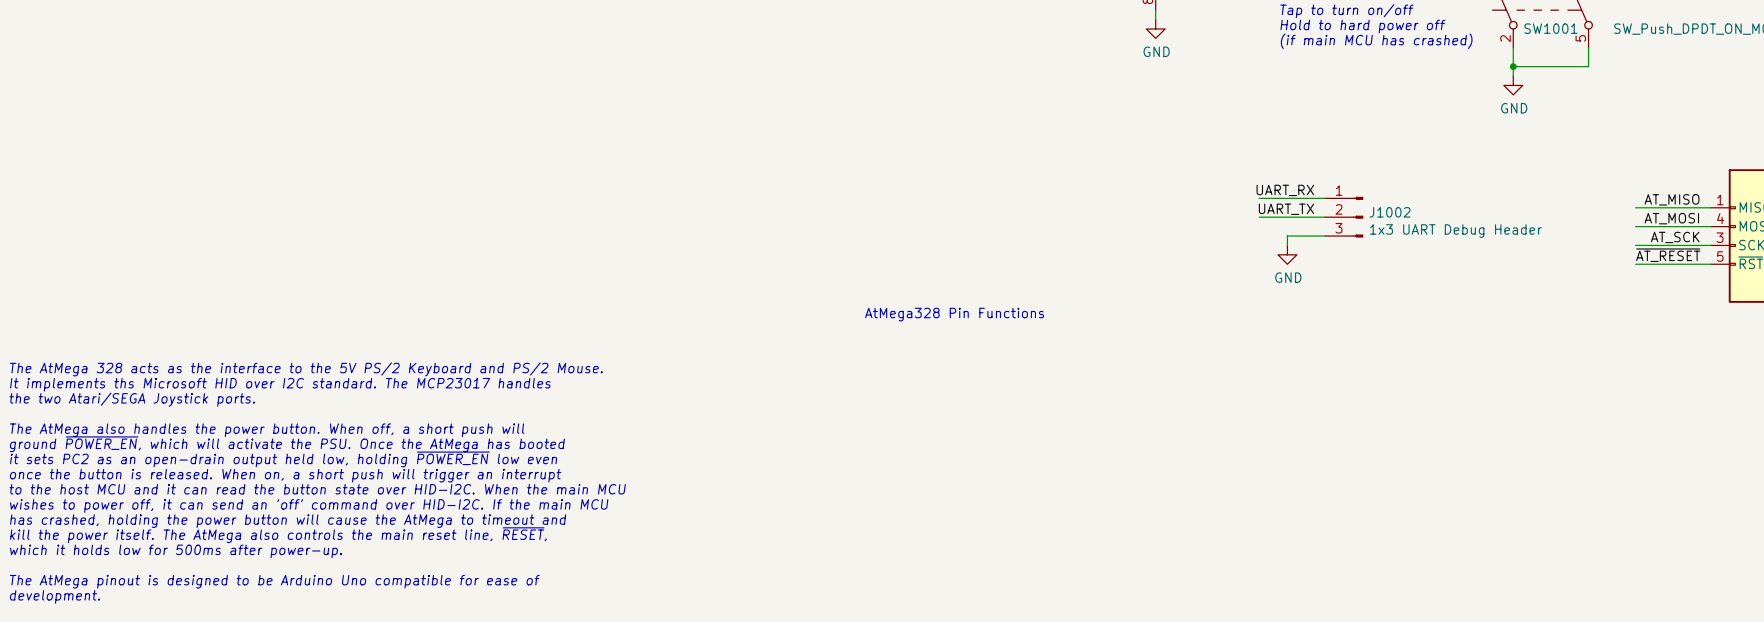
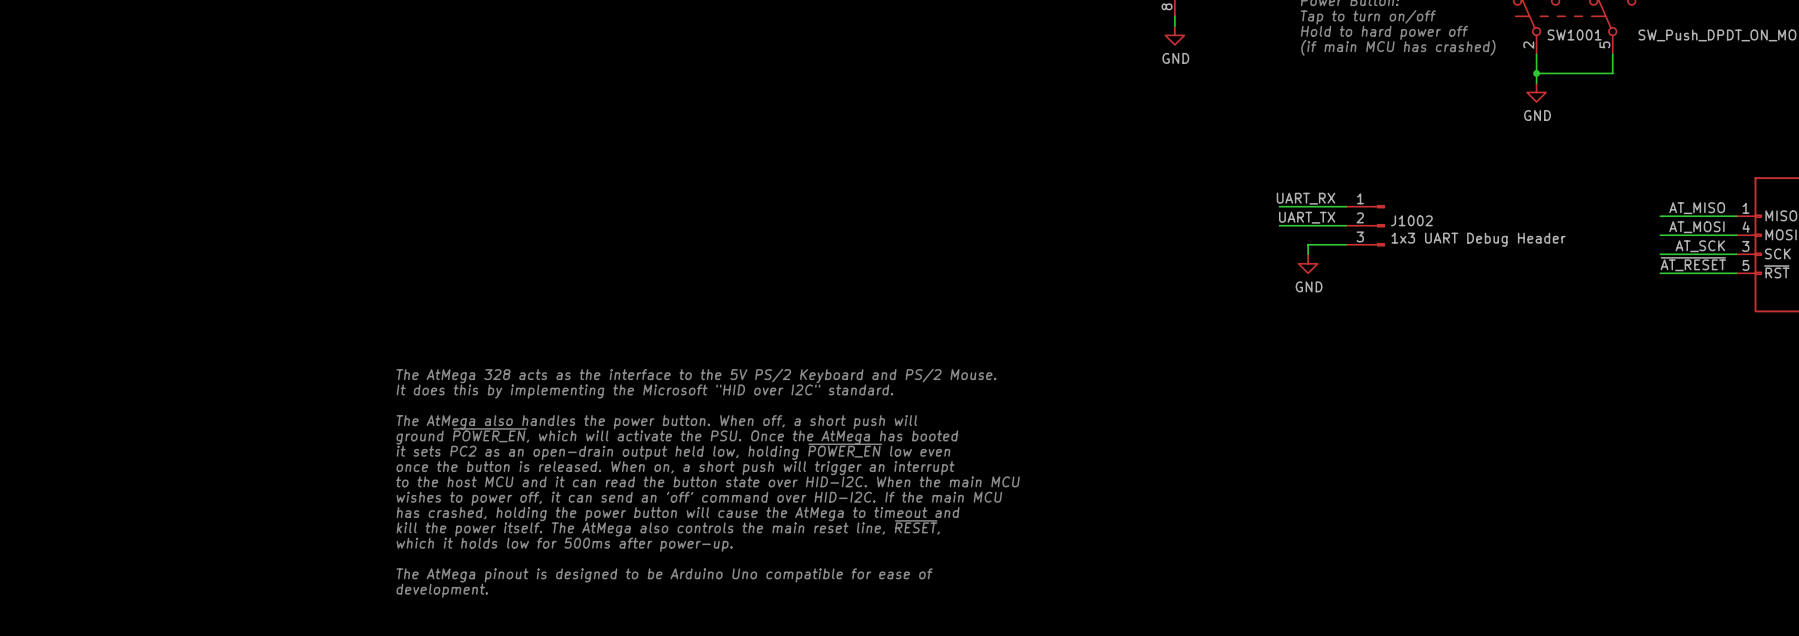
text: AtMega328 Pin Functions (954, 314) -> none
text: none -> The AtMega 328 acts as the interface to the 5V PS/2 Keyboard and PS/2 Mouse. (696, 375)
text: The AtMega 328 acts as the interface to the 5V PS/2 Keyboard and PS/2 Mouse. (306, 369) -> none
text: none -> It does this by implementing the Microsoft "HID over I2C" standard. (644, 391)
text: It implements ths Microsoft HID over I2C standard. The MCP23017 handles (280, 384) -> none
text: the two Atari/SEGA Joystick ports. (132, 399) -> none
text: none -> The AtMega also handles the power button. When off, a short push will (656, 422)
text: none -> ground ~{POWER_EN}, which will activate the PSU. Once the AtMega has booted (677, 436)
text: The AtMega also handles the power button. When off, a short push will (267, 430) -> none
text: none -> it sets PC2 as an open-drain output held low, holding ~{POWER_EN} low even (673, 451)
text: ground ~{POWER_EN}, which will activate the PSU. Once the AtMega has booted (287, 444) -> none
text: none -> once the button is released. When on, a short push will trigger an interrupt (675, 468)
text: it sets PC2 as an open-drain output held low, holding ~{POWER_EN} low even (283, 459) -> none
text: none -> to the host MCU and it can read the button state over HID-I2C. When the main MCU (707, 481)
text: once the button is released. When on, a short push will trigger an interrupt (285, 475) -> none
text: none -> wishes to power off, it can send an 'off' command over HID-I2C. If the main MCU (699, 498)
text: to the host MCU and it can read the button state over HID-I2C. When the main MCU (317, 489) -> none
text: none -> has crashed, holding the power button will cause the AtMega to timeout and (678, 514)
text: wishes to power off, it can send an 'off' command over HID-I2C. If the main MCU (309, 505) -> none
text: none -> kill the power itself. The AtMega also controls the main reset line, ~{RESET}, (668, 528)
text: has crashed, holding the power button will cause the AtMega to timeout and (288, 521) -> none
text: none -> which it holds low for 500ms after power-up. (564, 544)
text: kill the power itself. The AtMega also controls the main reset line, ~{RESET}, (278, 535) -> none
text: which it holds low for 500ms after power-up. (175, 551) -> none
text: none -> The AtMega pinout is designed to be Arduino Uno compatible for ease of (664, 575)
text: none -> development. (442, 590)
text: The AtMega pinout is designed to be Arduino Uno compatible for ease of (274, 581) -> none
text: development. (54, 596) -> none

